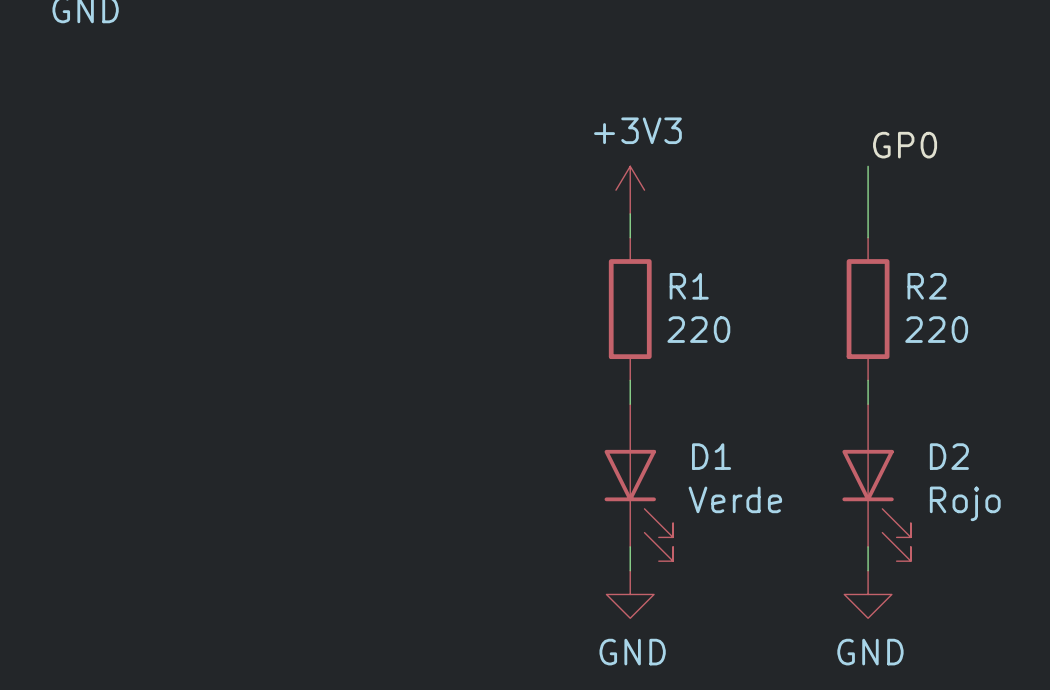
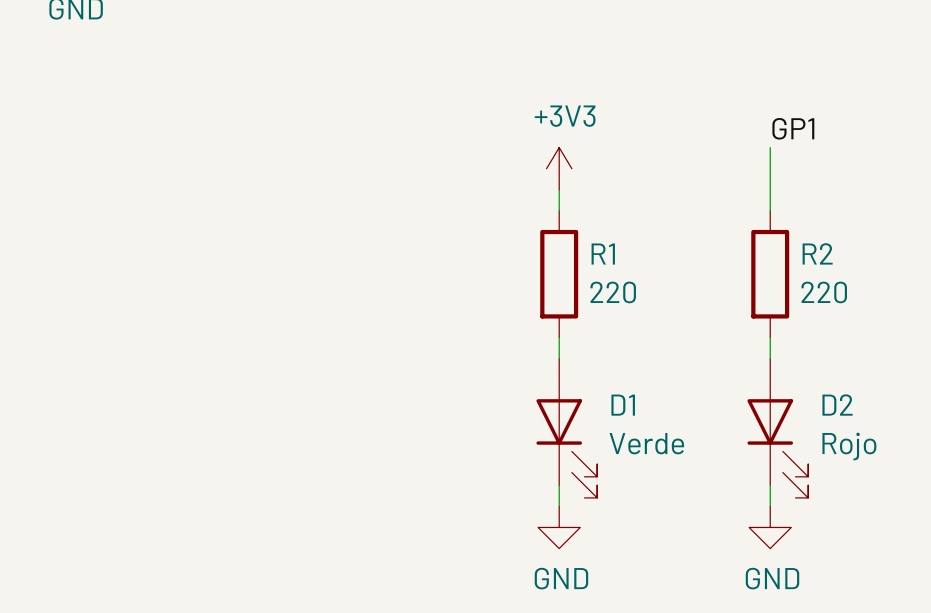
label: GP0 (905, 145) -> GP1 (793, 128)

